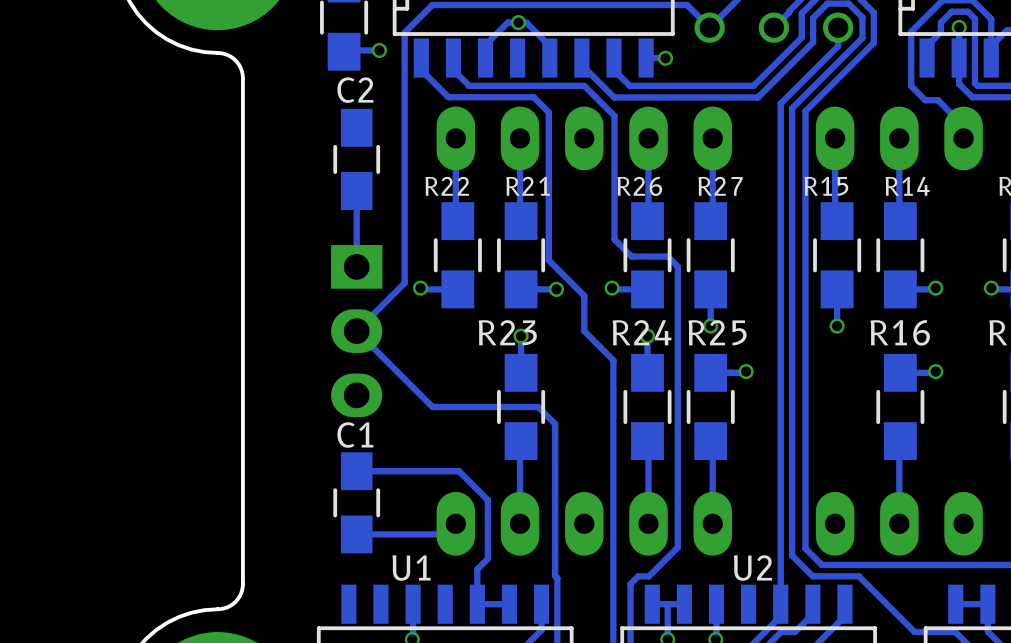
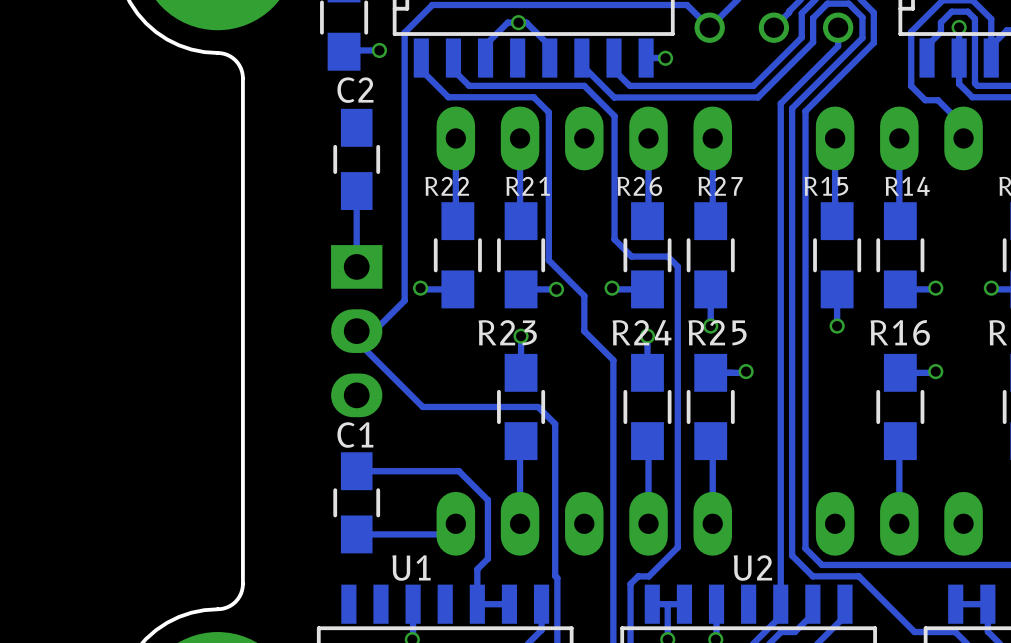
track: (404, 283) (356, 331) (432, 406) -> (360, 344) (422, 406) (432, 406)
track: none -> (404, 283) (404, 300) (360, 344)

